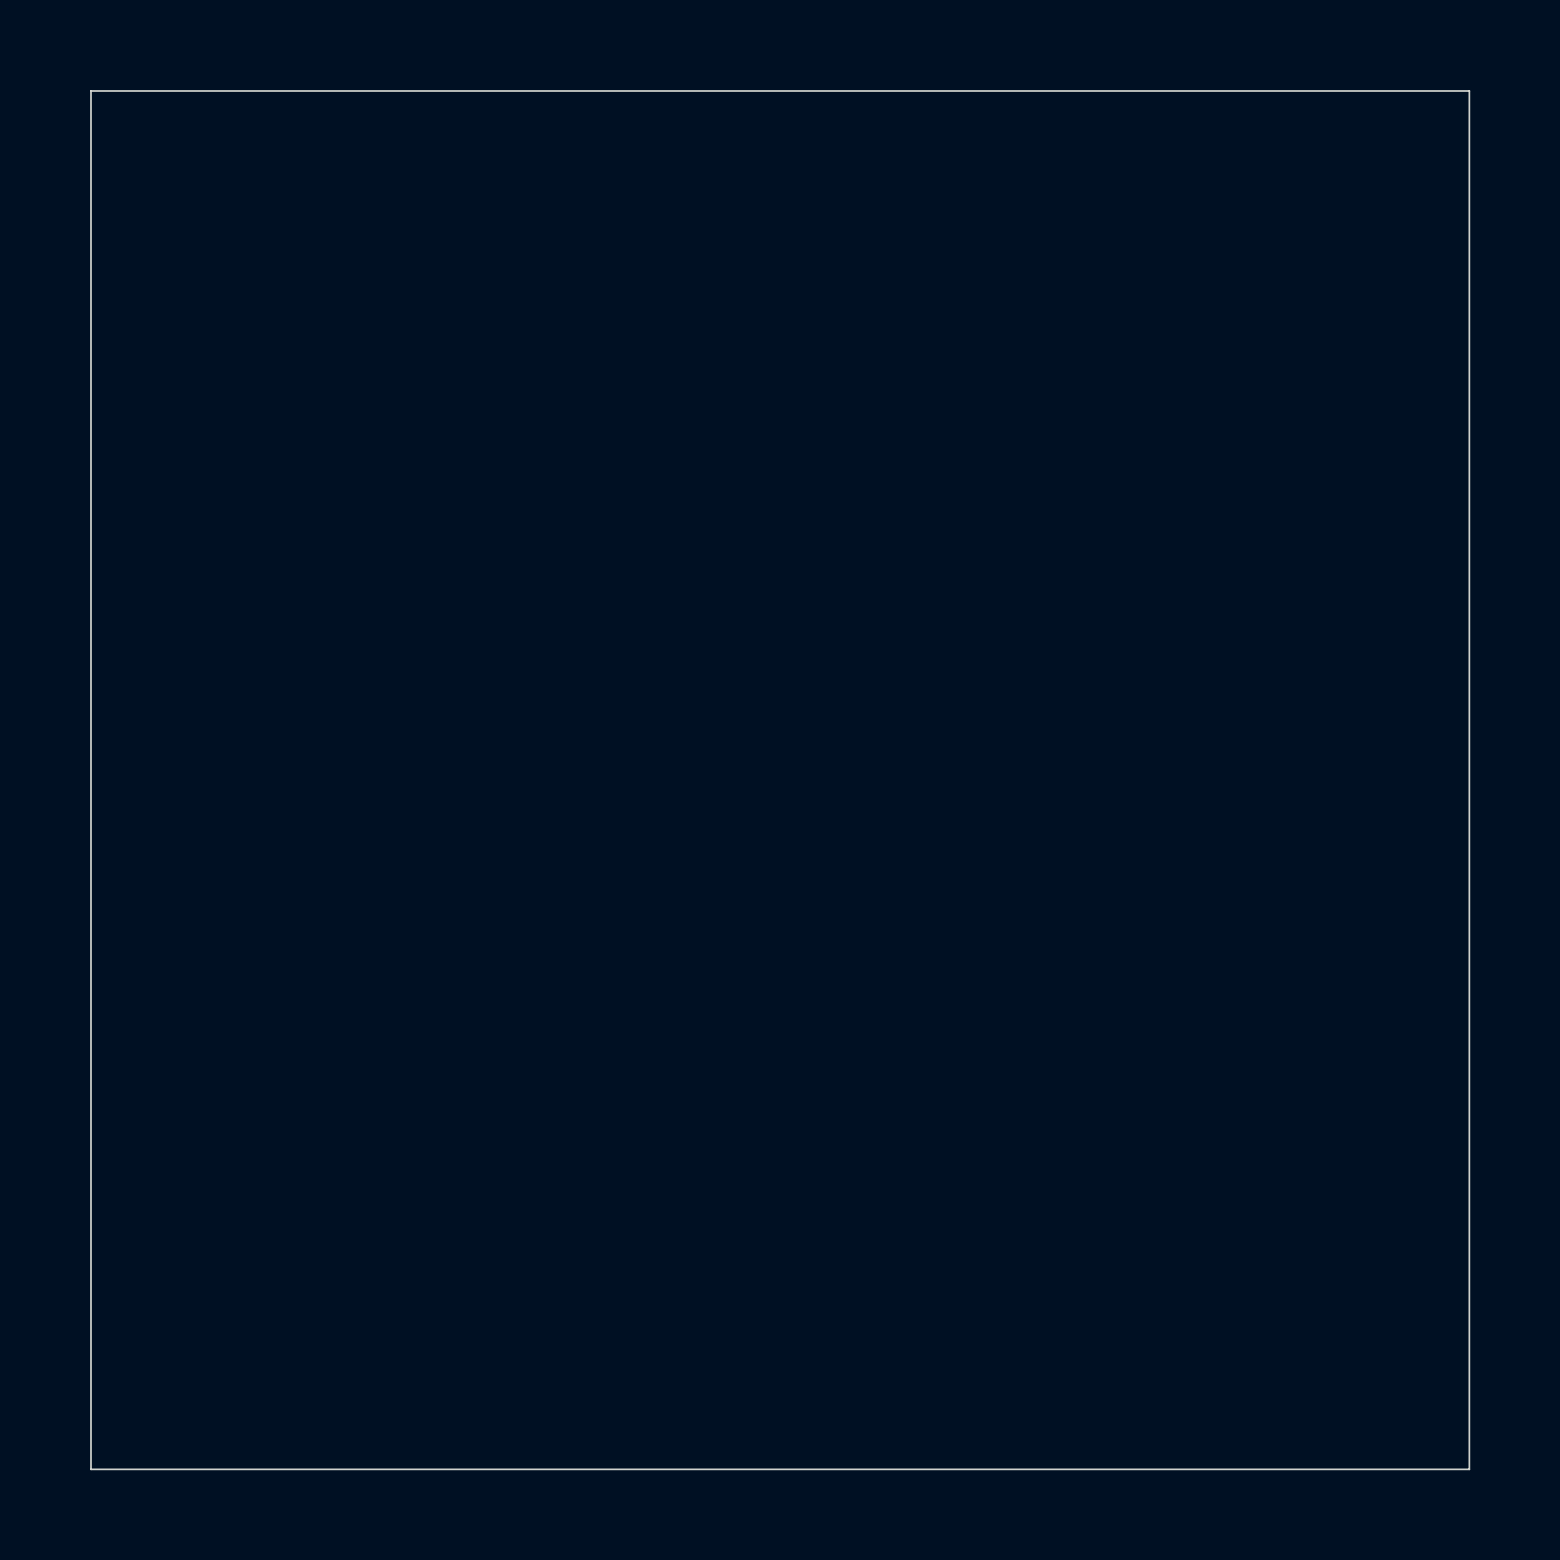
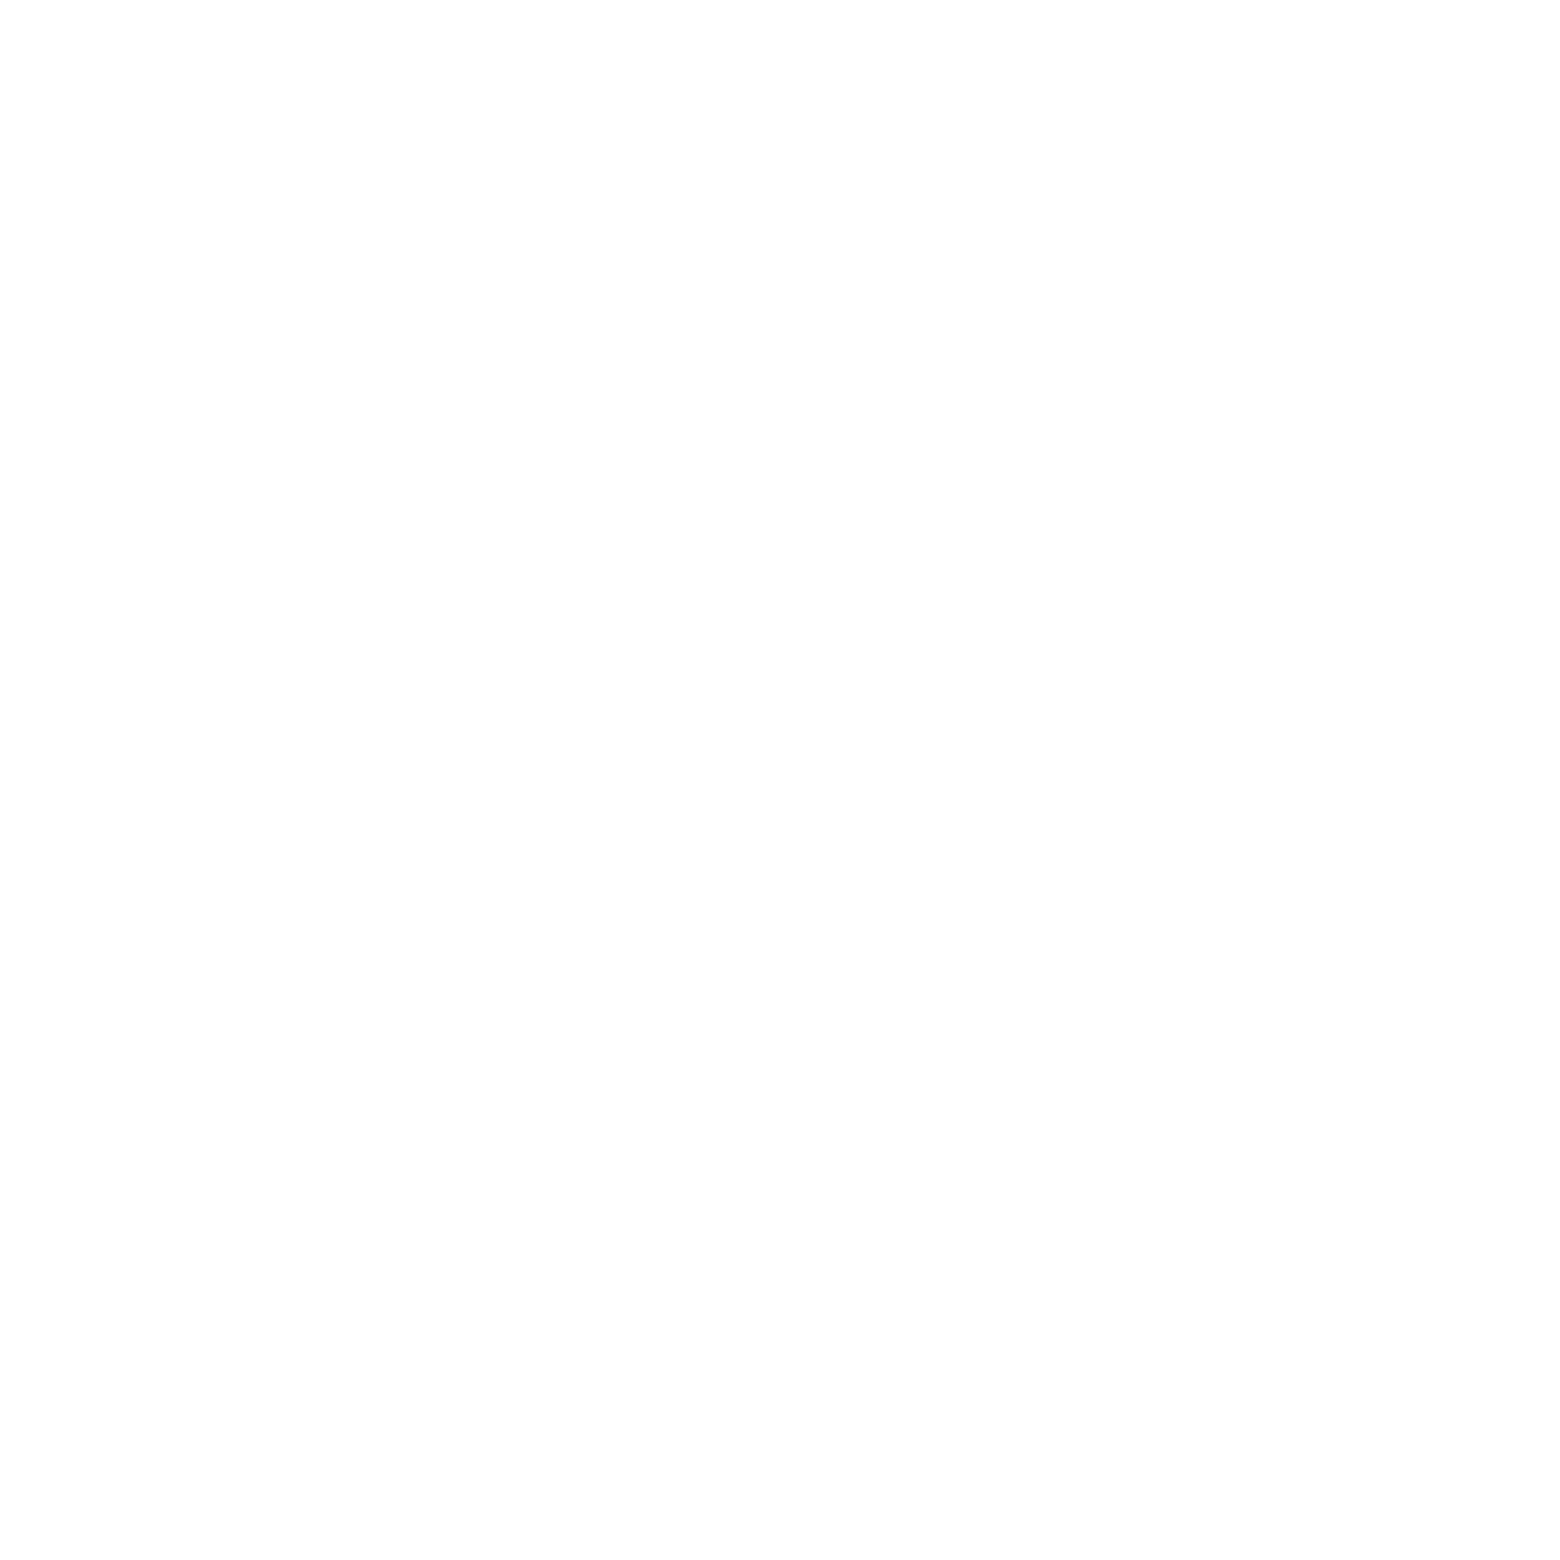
board edge: (1469, 90) (90, 90) (90, 1469) (1469, 1469) (1469, 90) -> none

